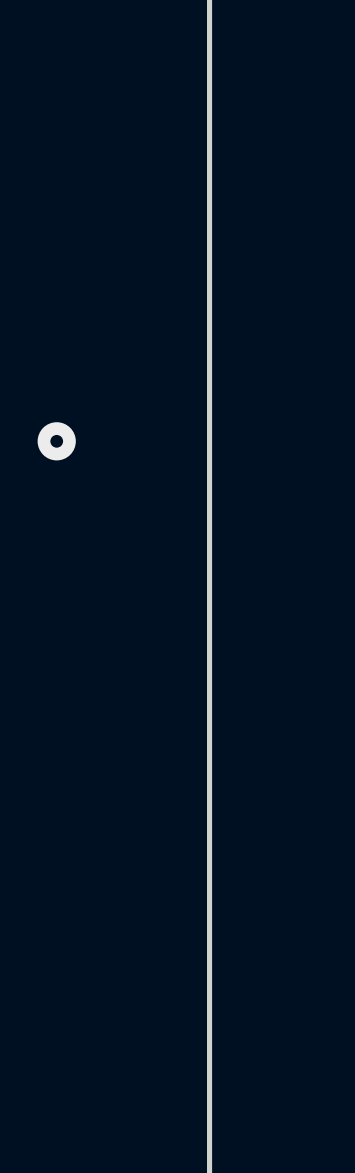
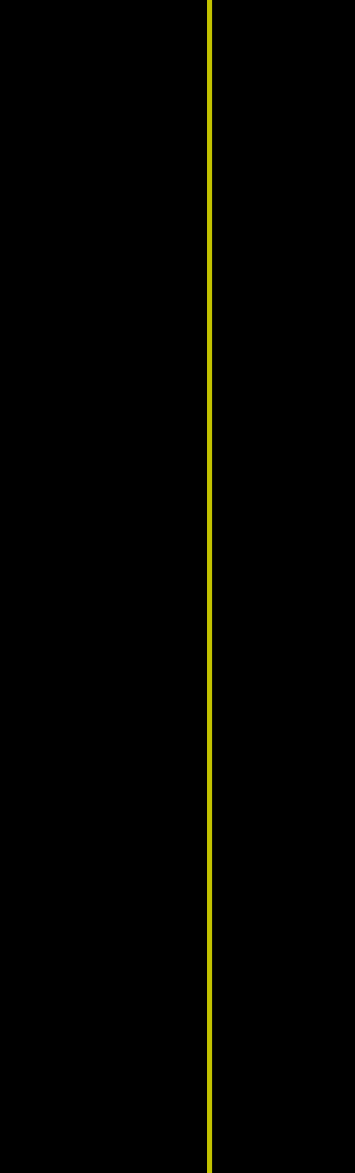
via: (56, 441) -> none

